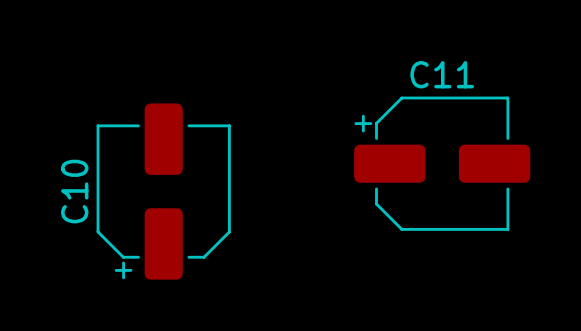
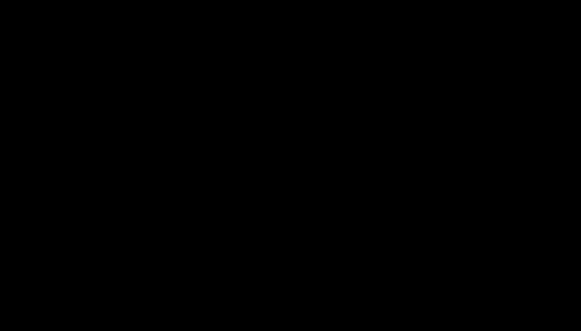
C11: (442, 163) -> none
C10: (163, 191) -> none

